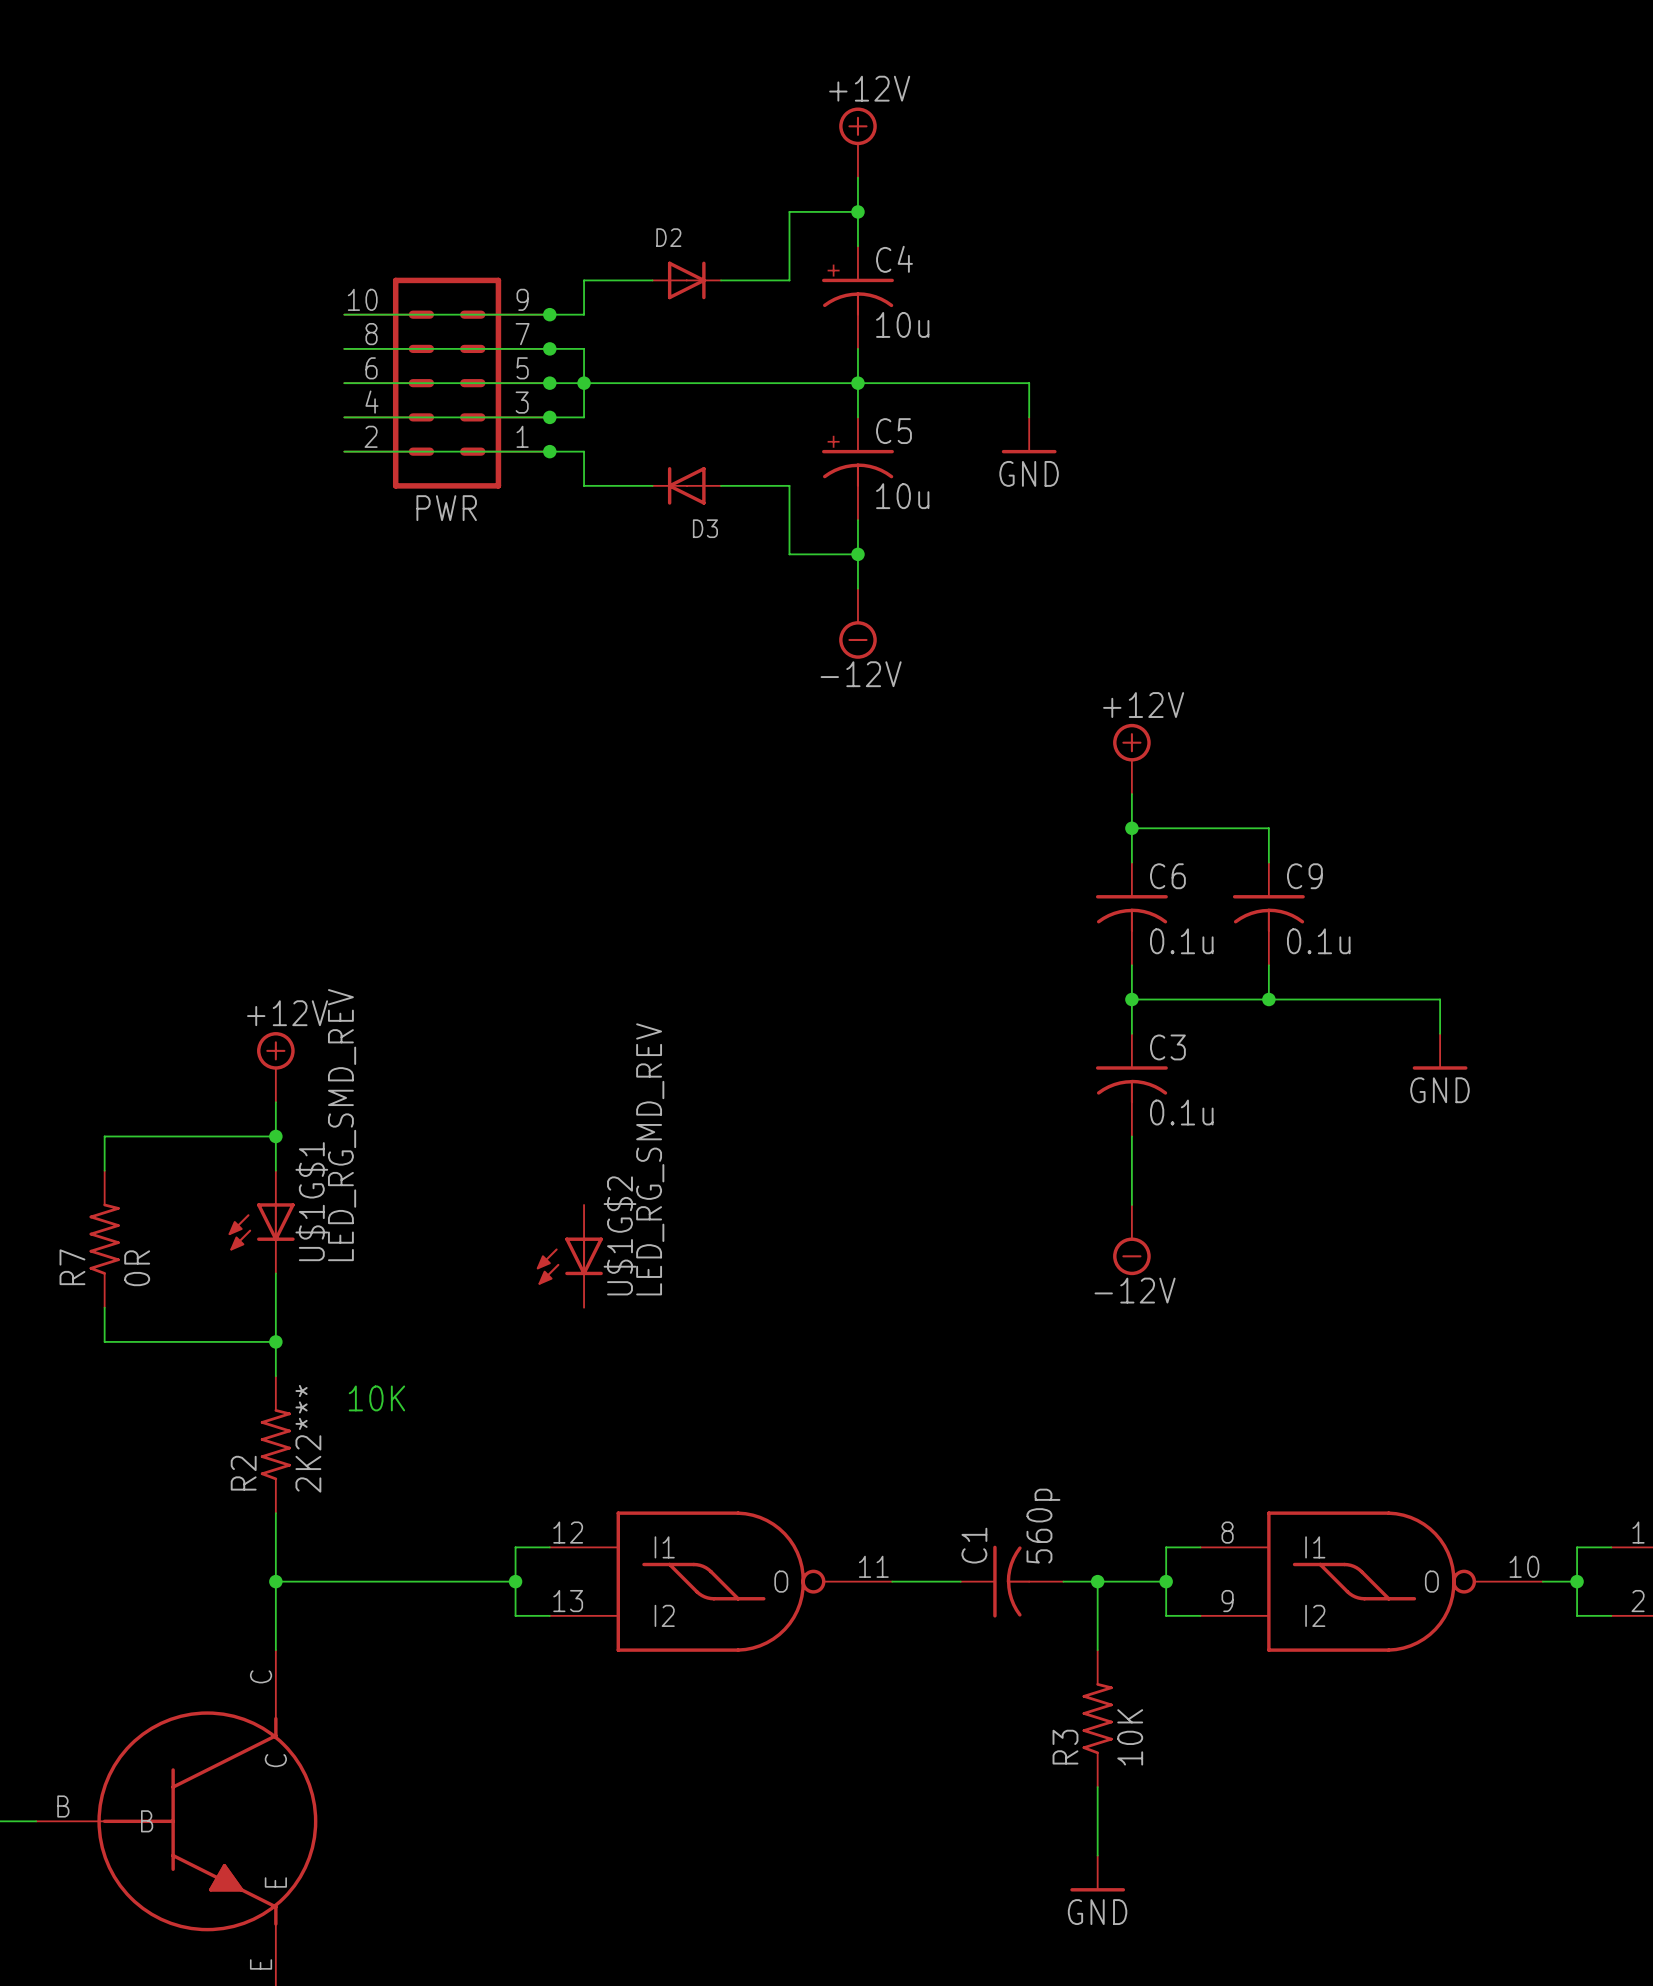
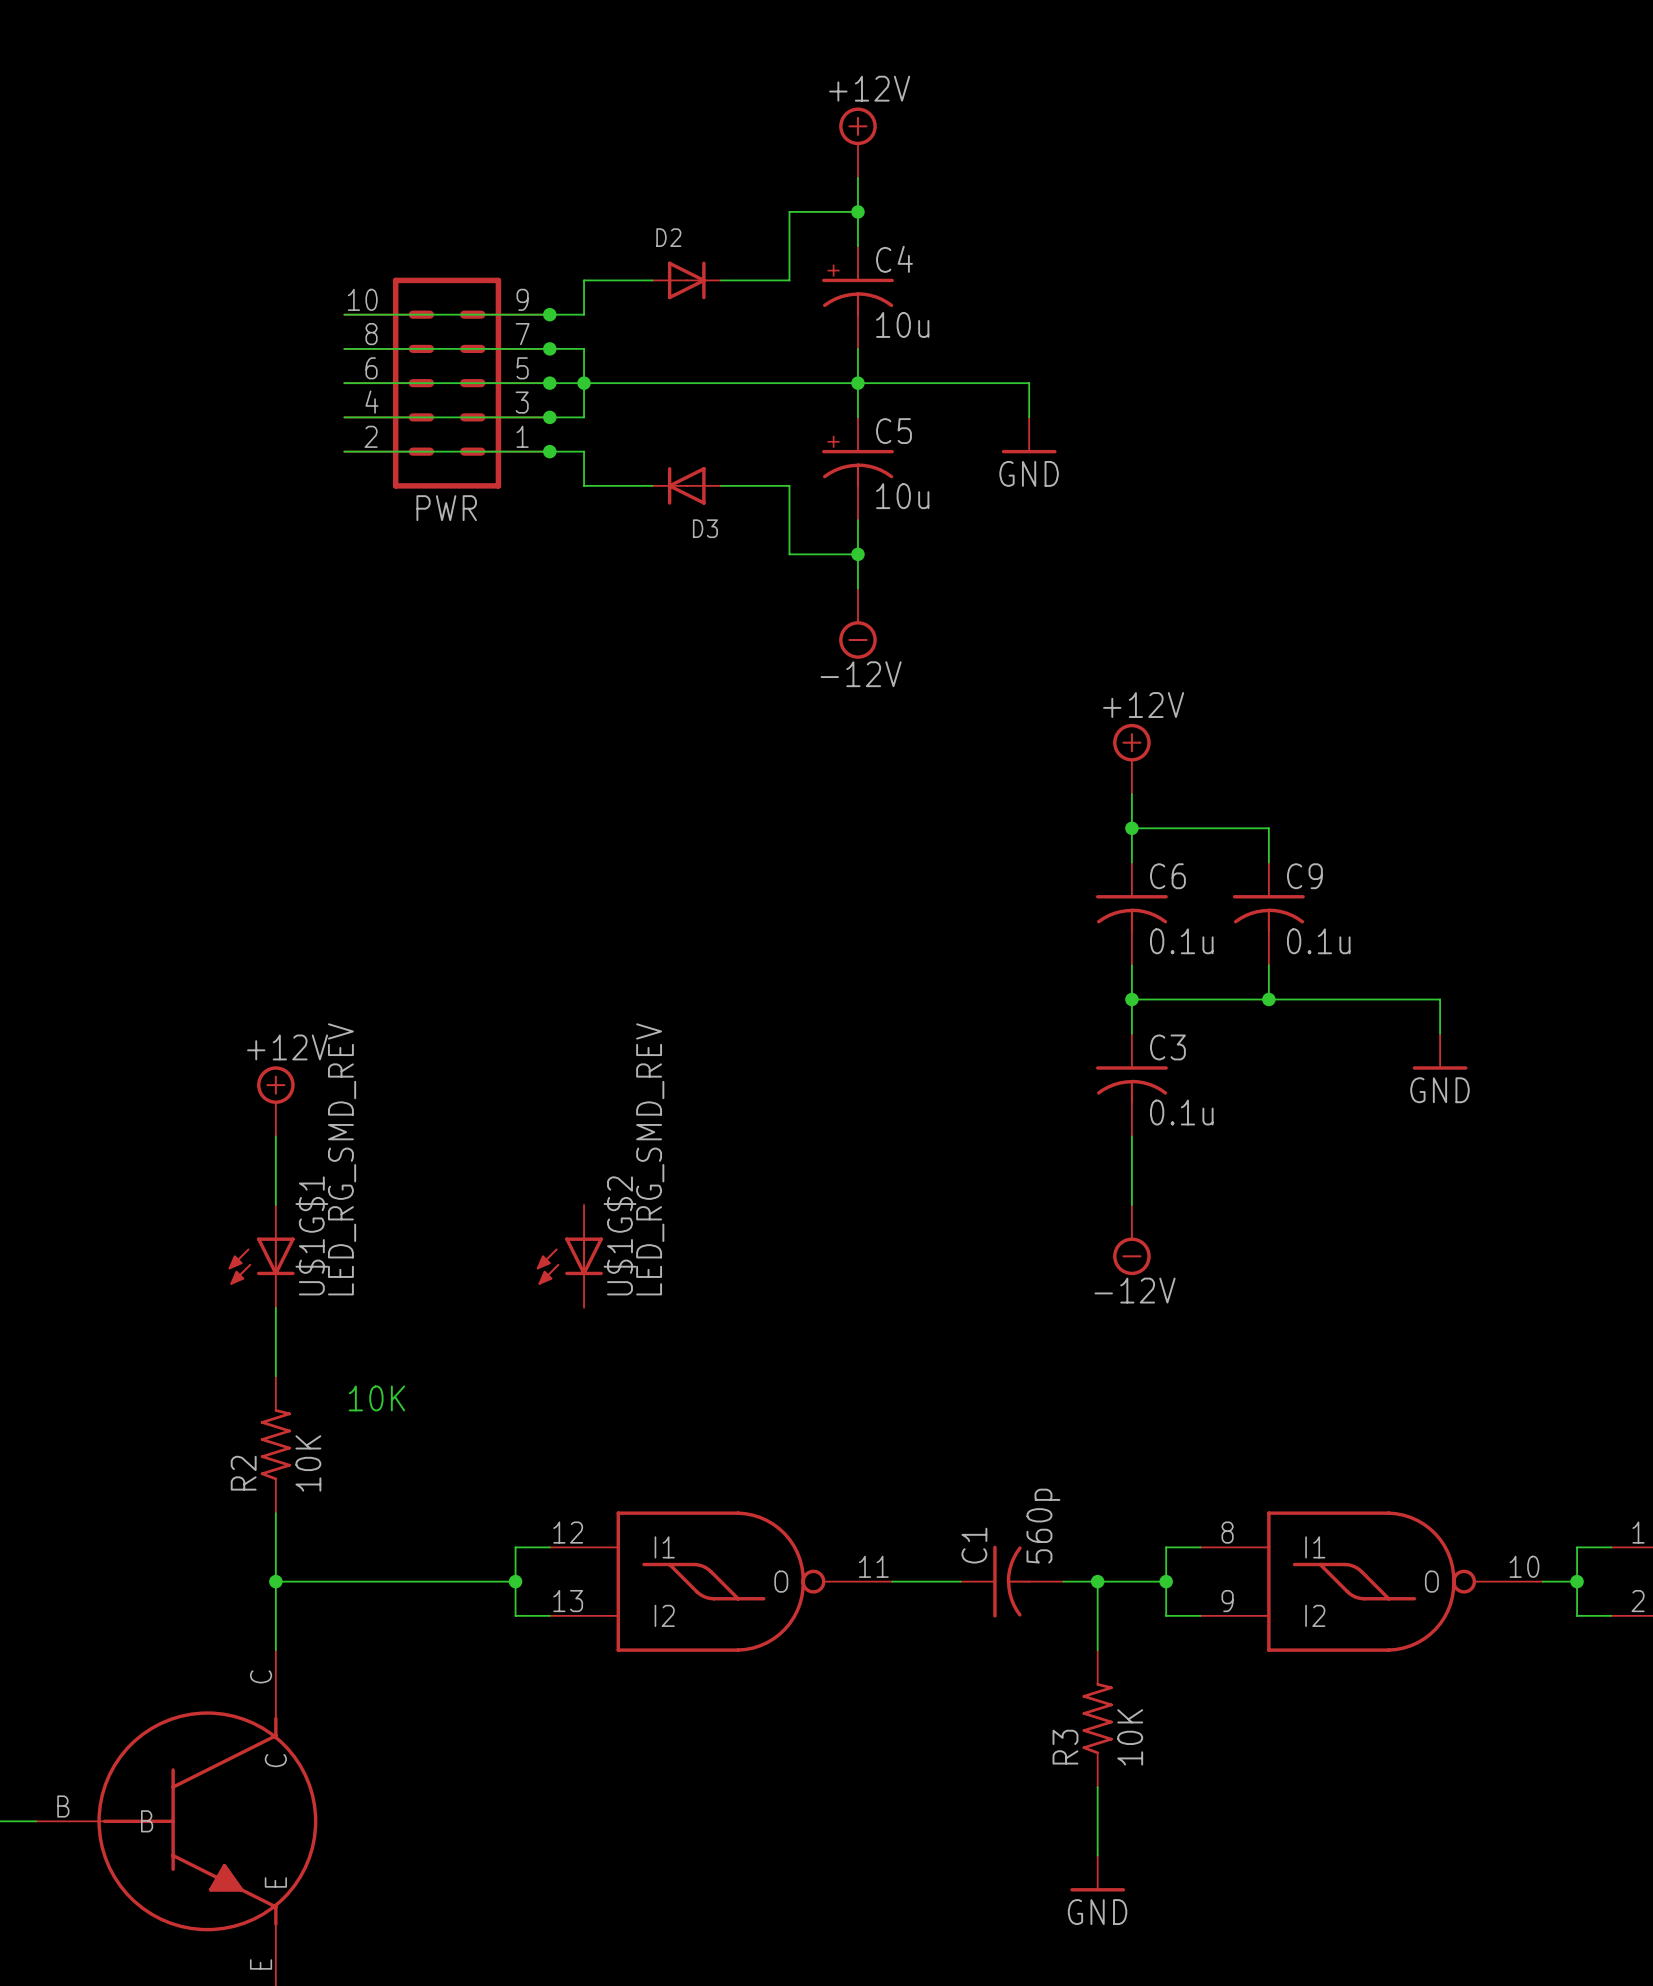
power symbol position: +12V (275, 1067) -> +12V (275, 1101)
wire: (275, 1102) (275, 1136) (104, 1136) (104, 1170) -> none
junction: (275, 1136) -> none
U$1G$1 position: (261, 1222) -> (261, 1256)
R7: 0R (104, 1239) -> none
wire: (104, 1307) (104, 1341) (275, 1341) -> none
junction: (275, 1341) -> none
R2 value: 2K2*** (308, 1438) -> 10K (308, 1463)

